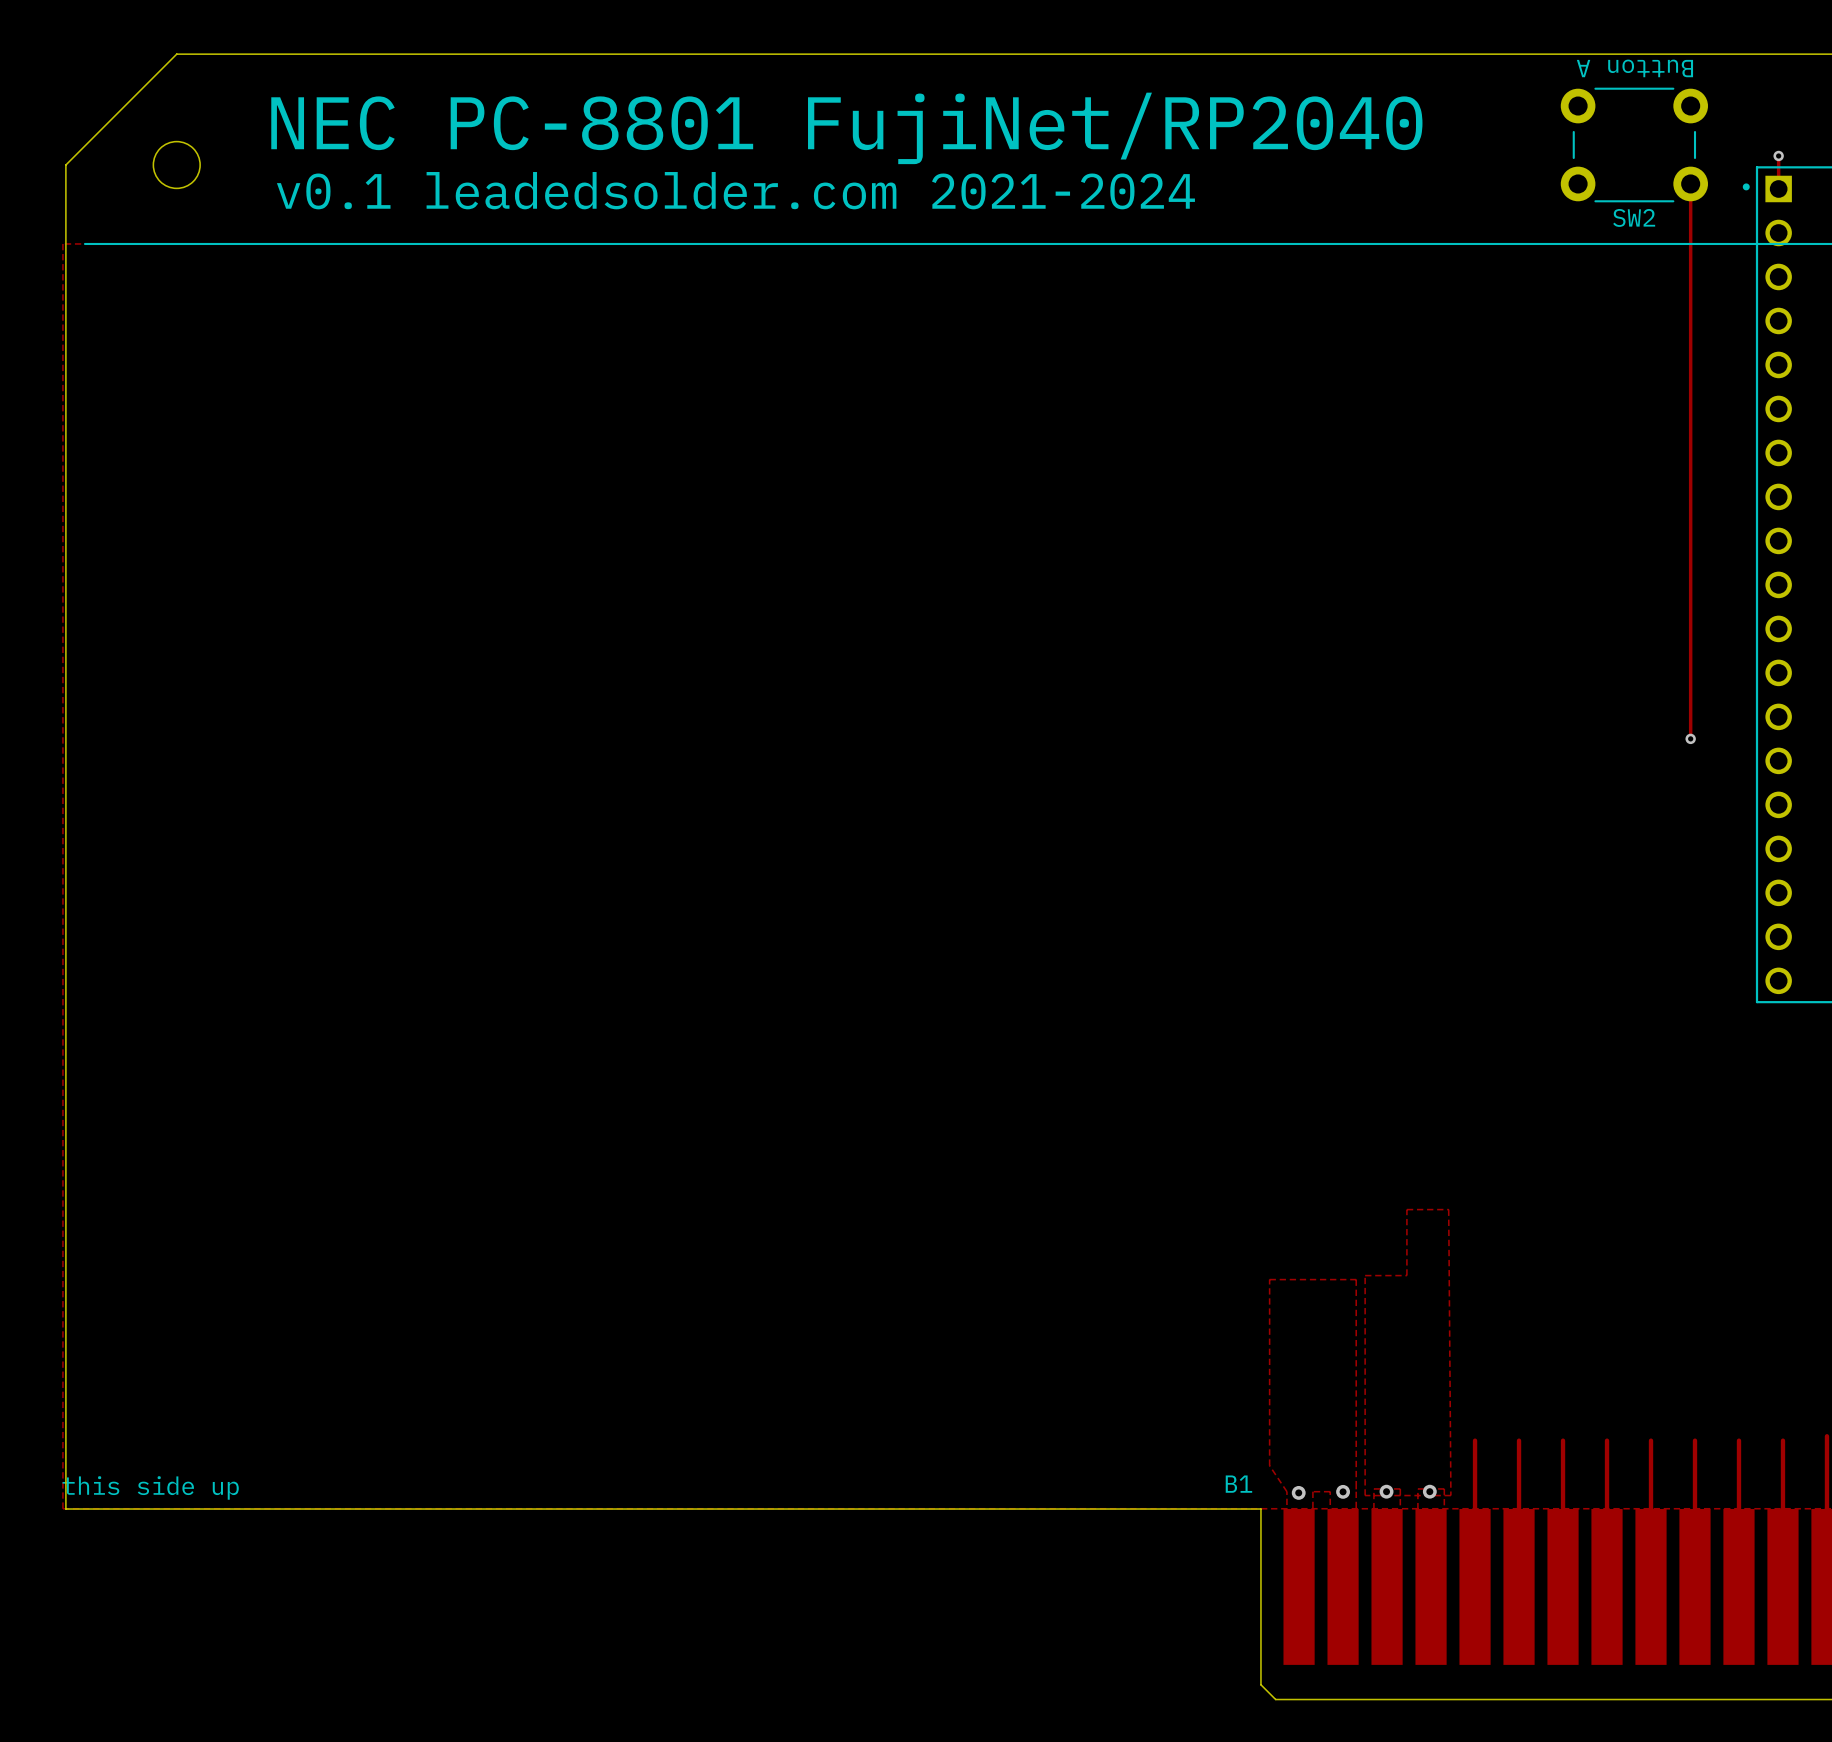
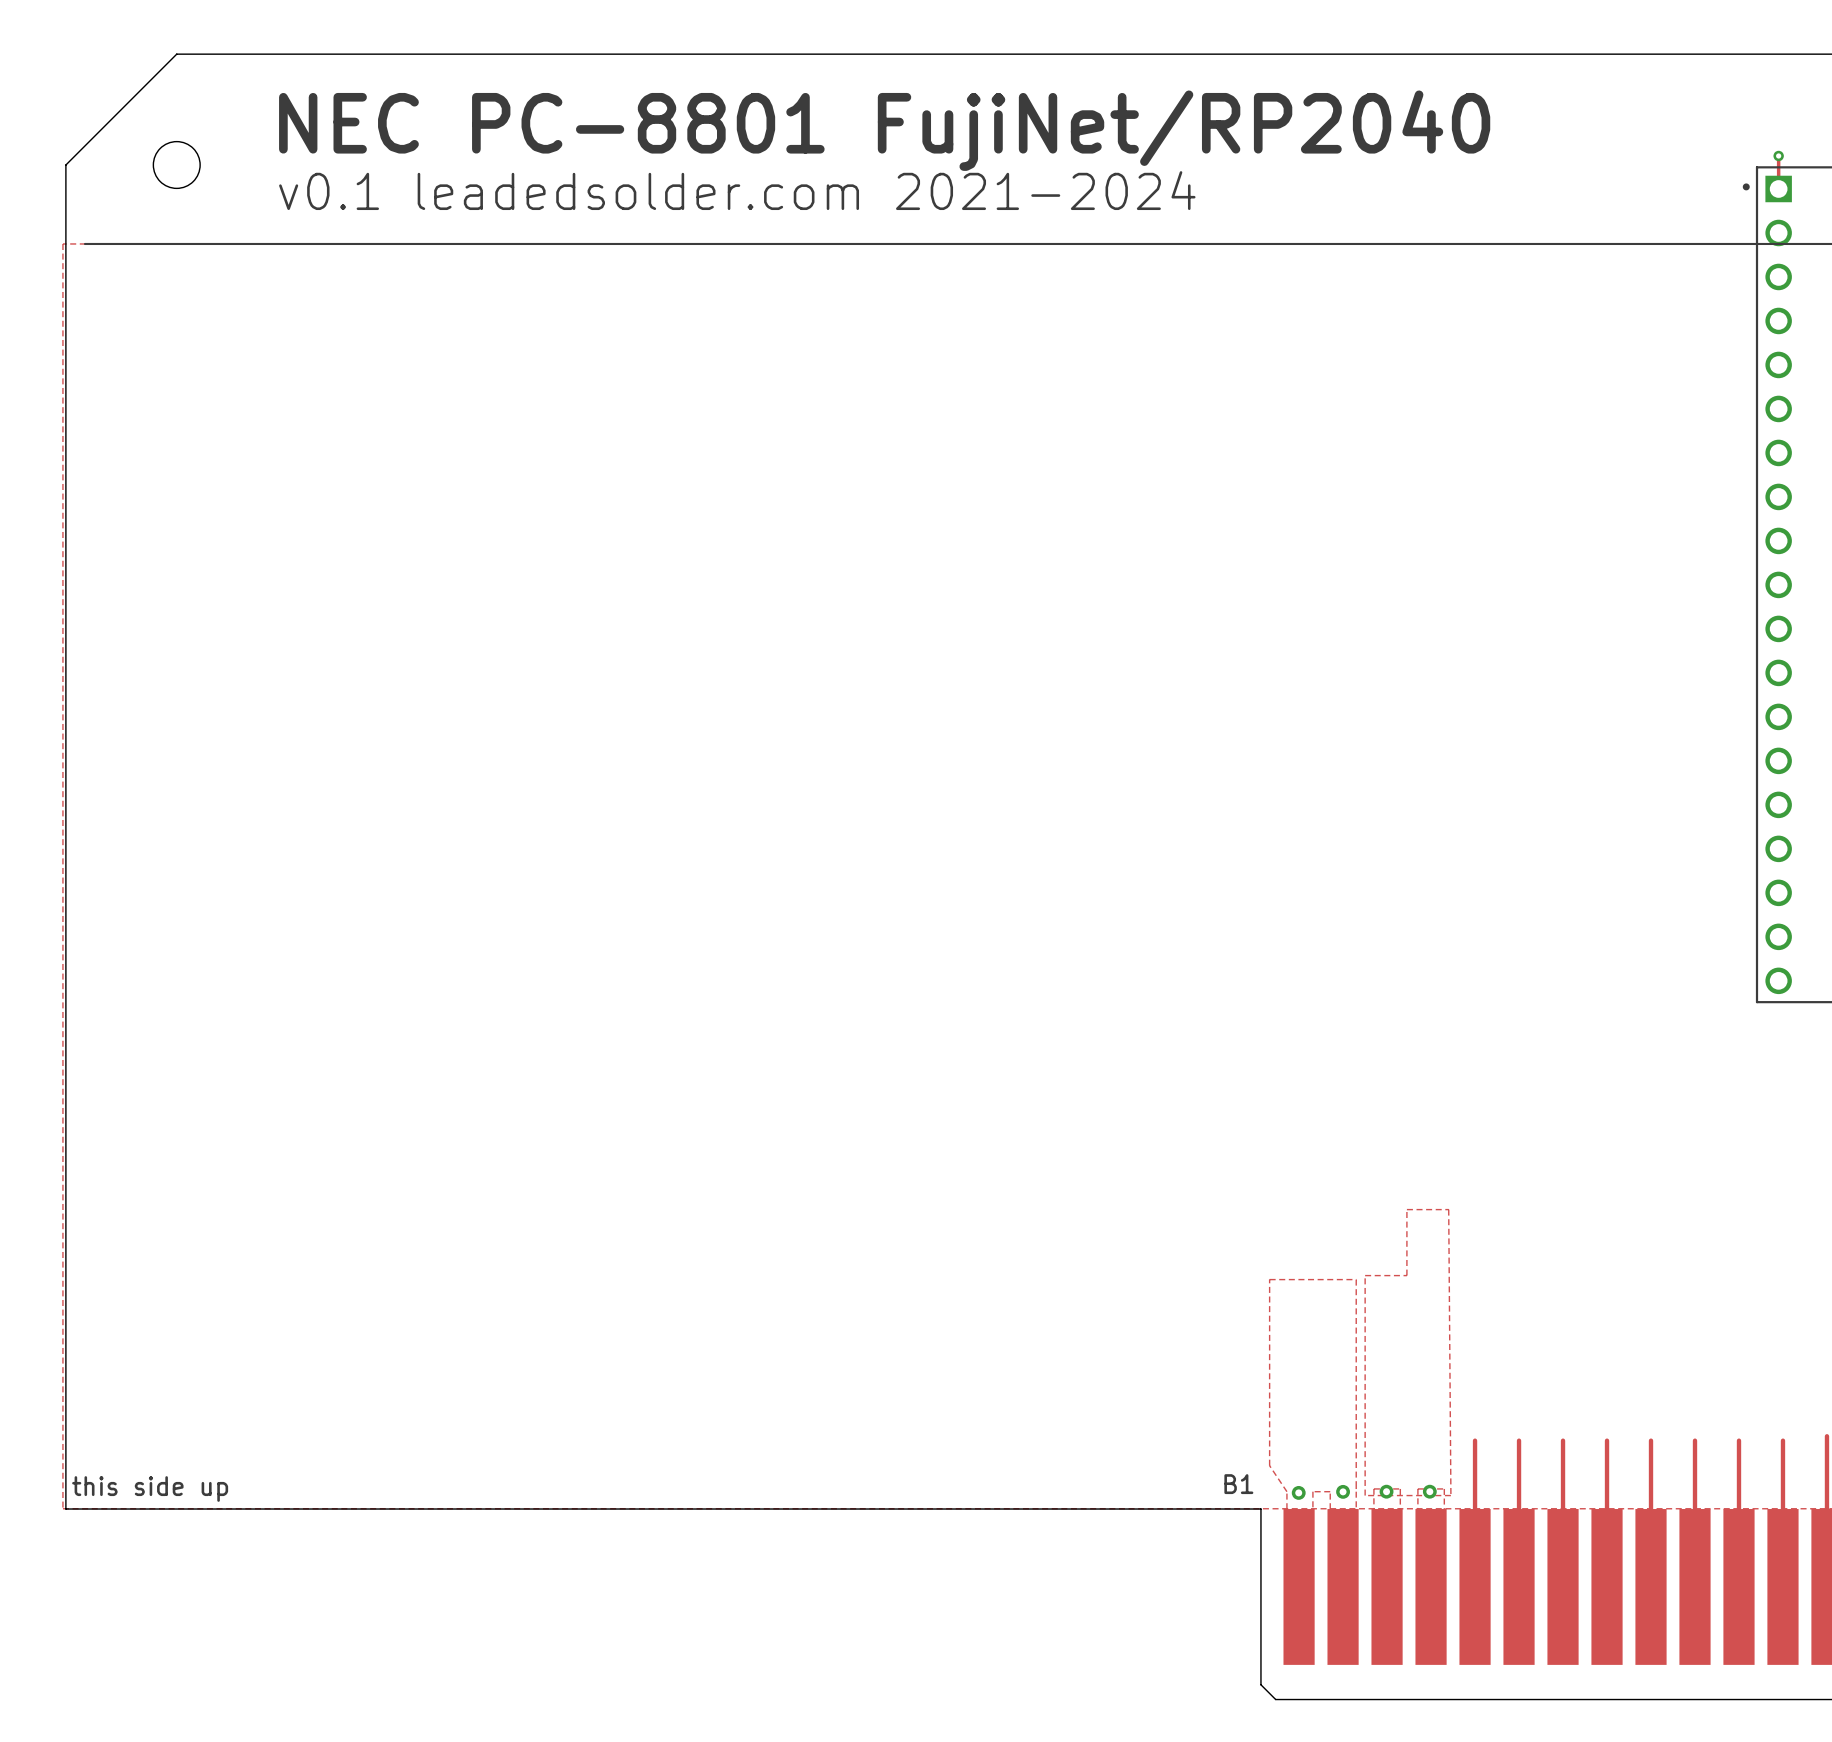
SW2: Button A (1634, 144) -> none
track: (1690, 183) (1690, 738) -> none
via: (1690, 738) -> none

